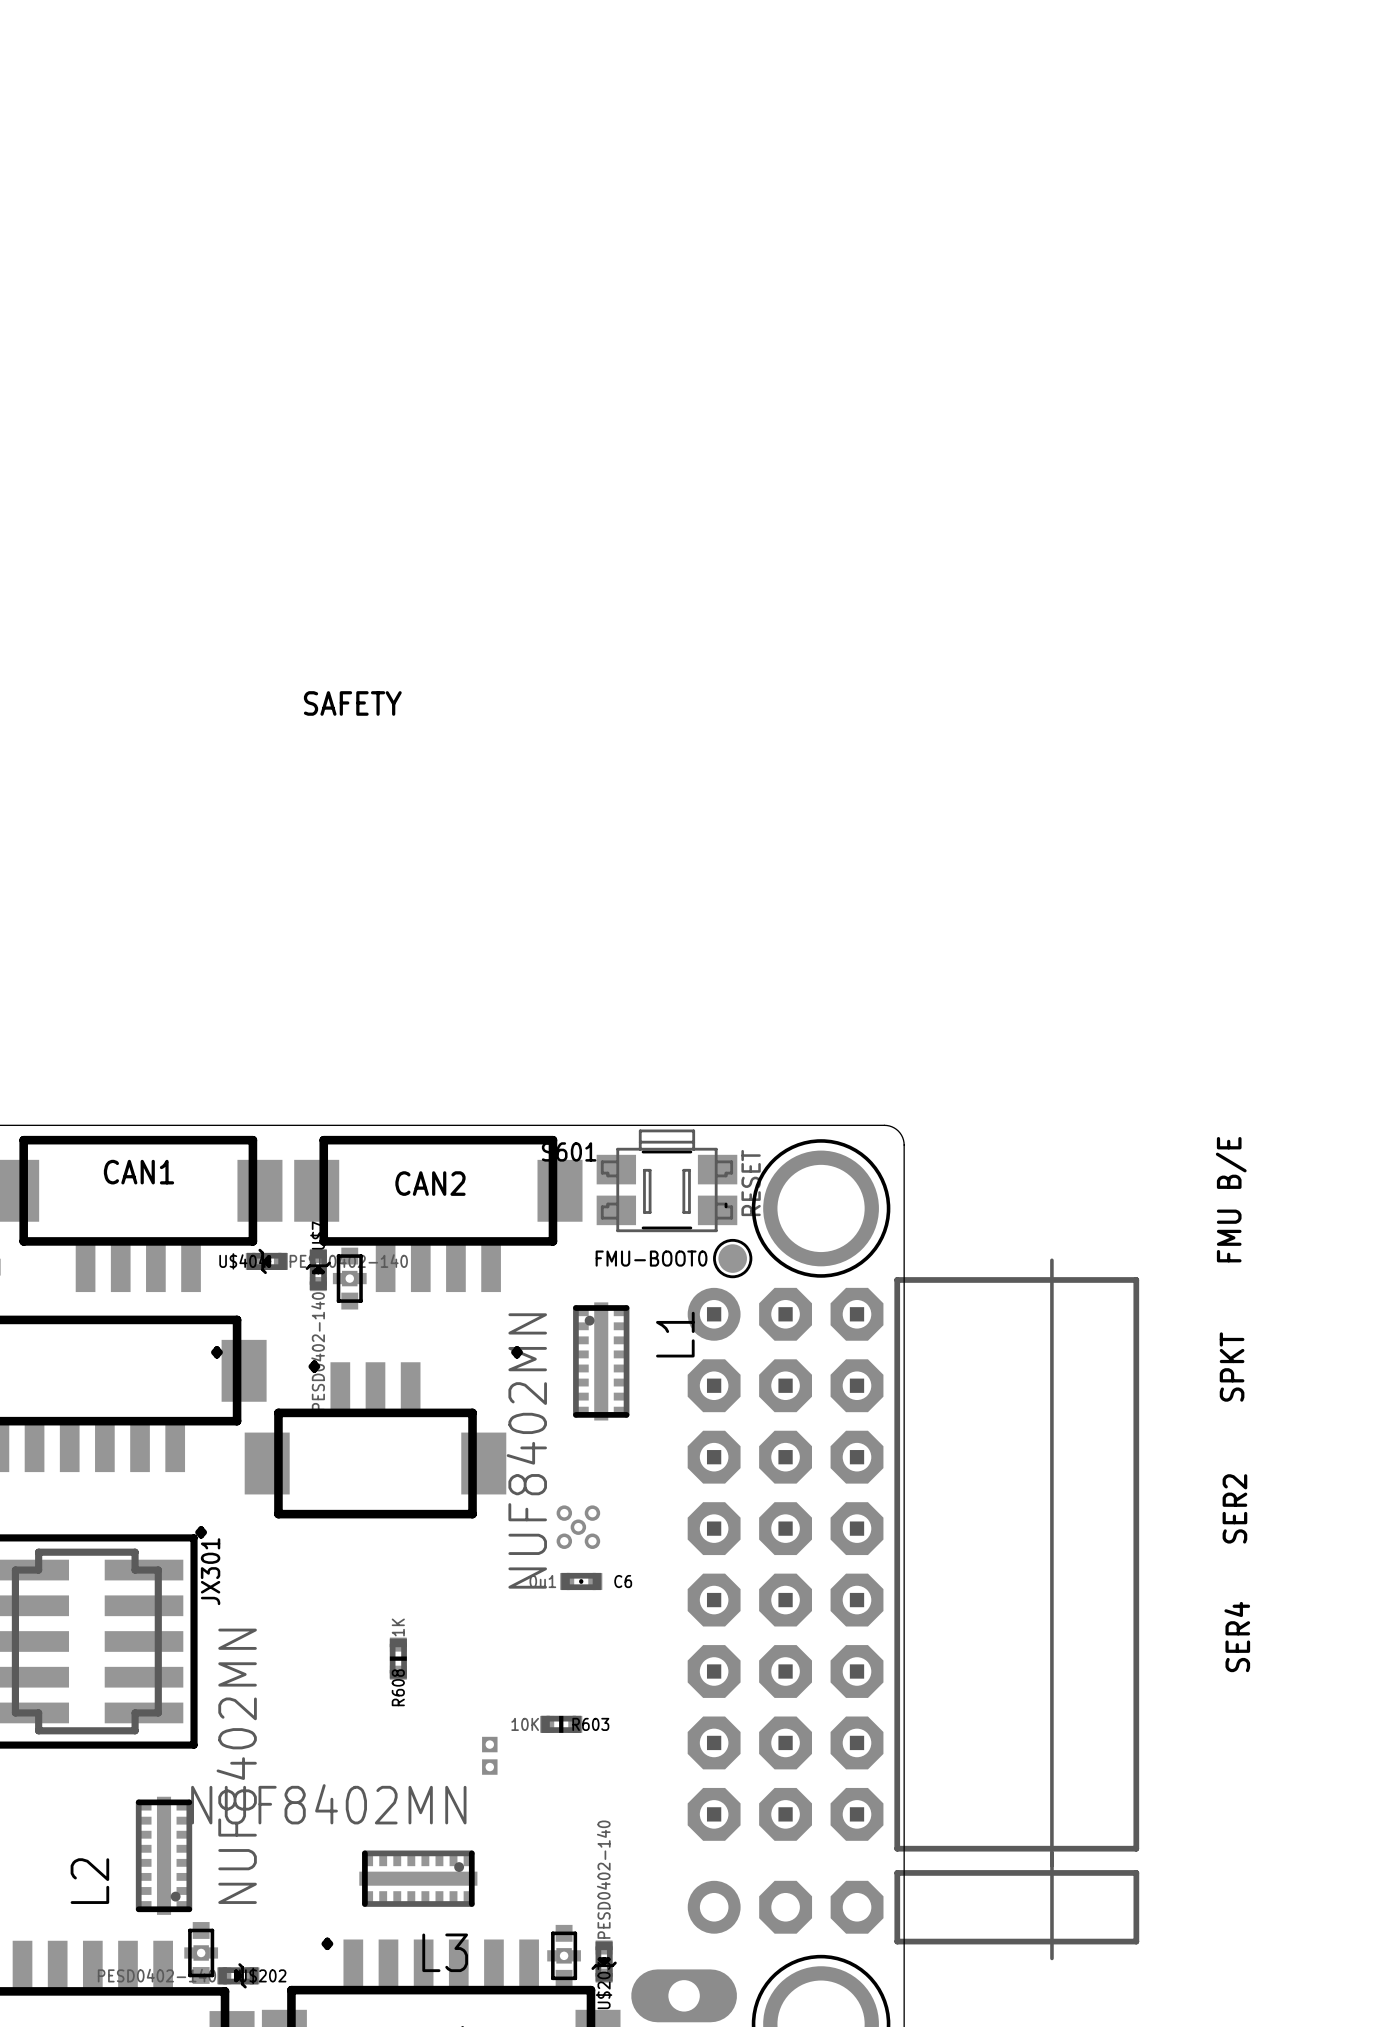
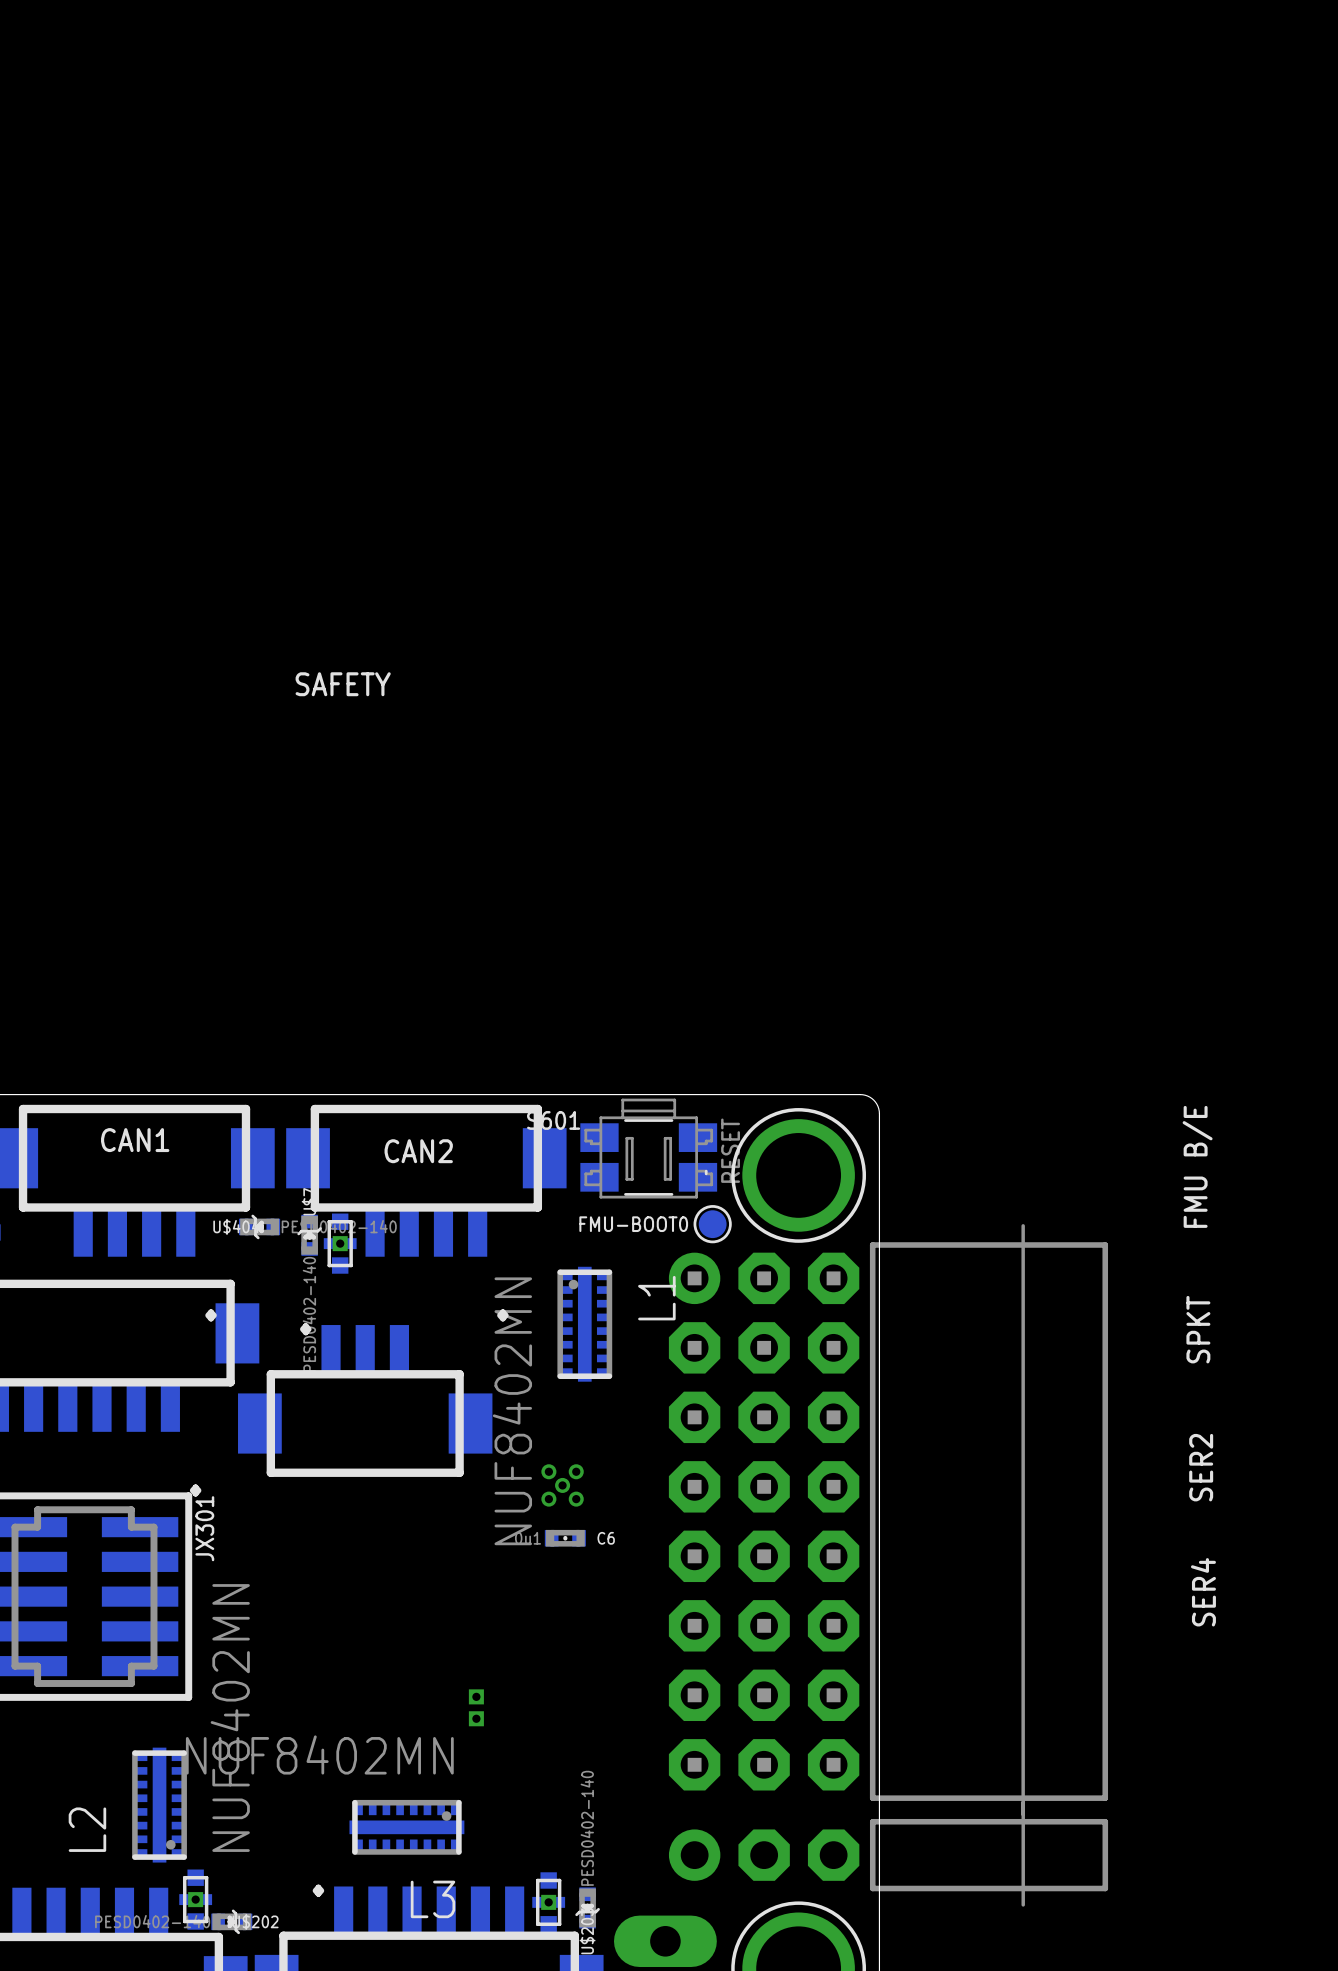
R608: 1K (398, 1658) -> none
R603: 10K (561, 1724) -> none

